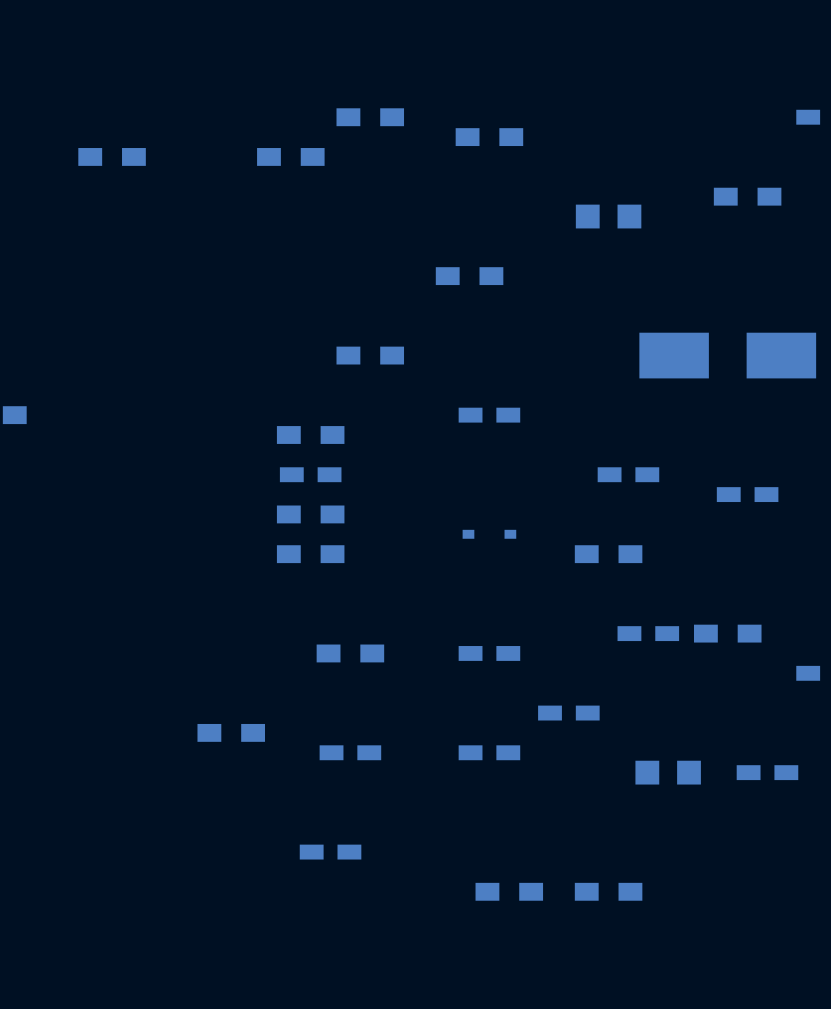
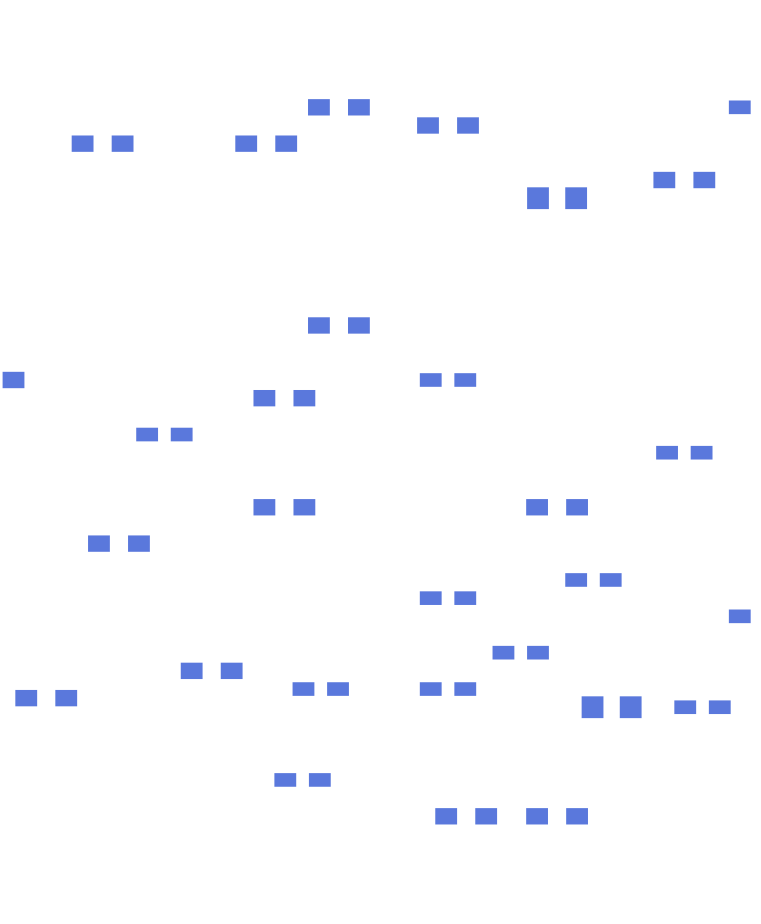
part: (469, 276) -> none
part: (727, 355) -> none
part position: (310, 474) -> (164, 434)
part: (628, 474) -> none
part: (310, 514) -> none
part: (489, 534) -> none
part: none -> (118, 543)
part: (727, 633) -> none
part: (350, 653) -> none
part: none -> (46, 698)

